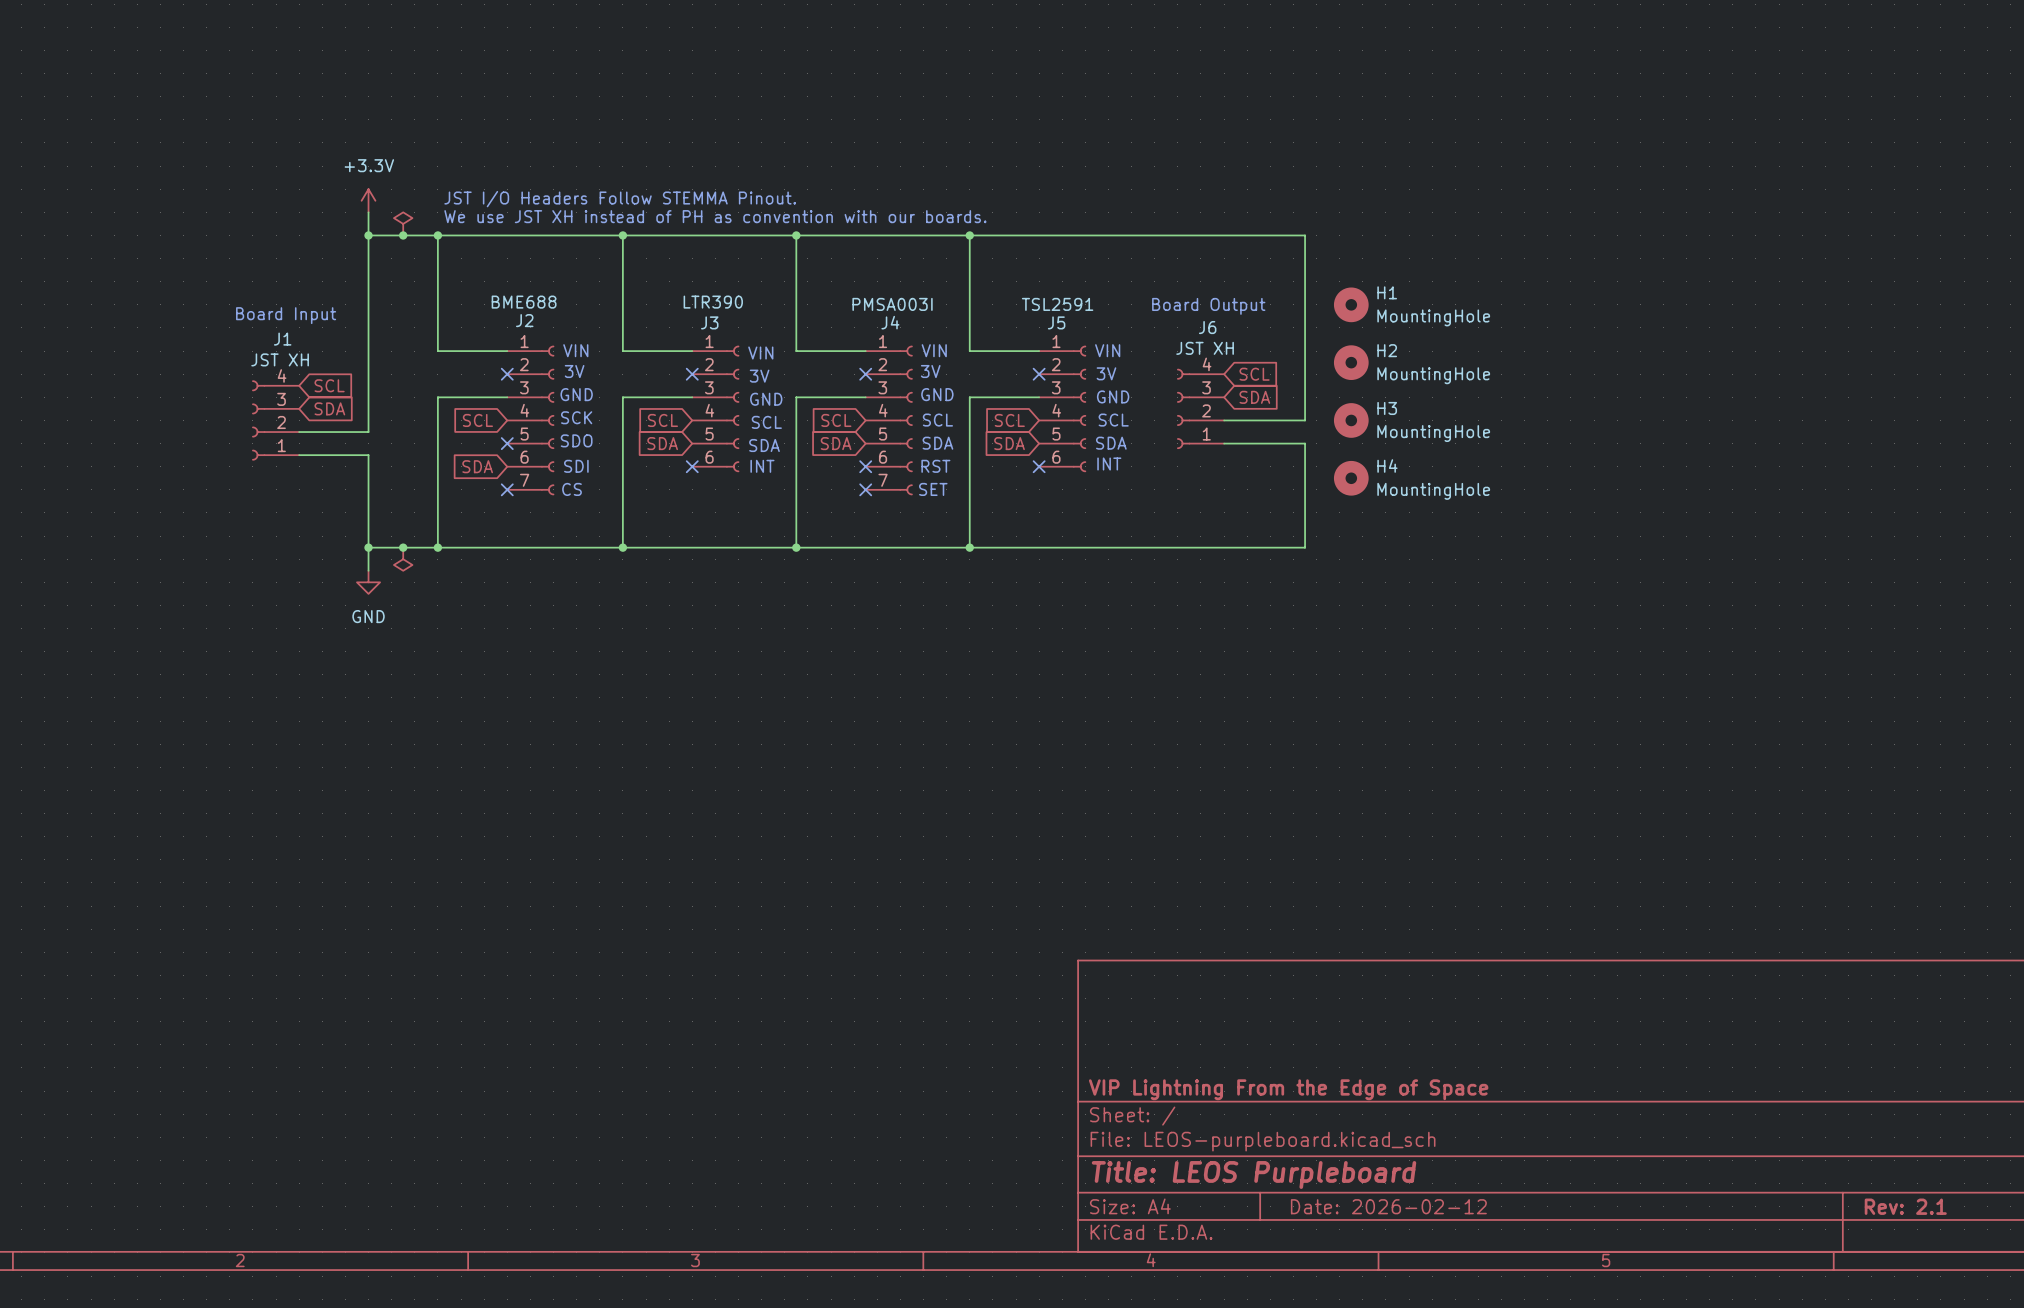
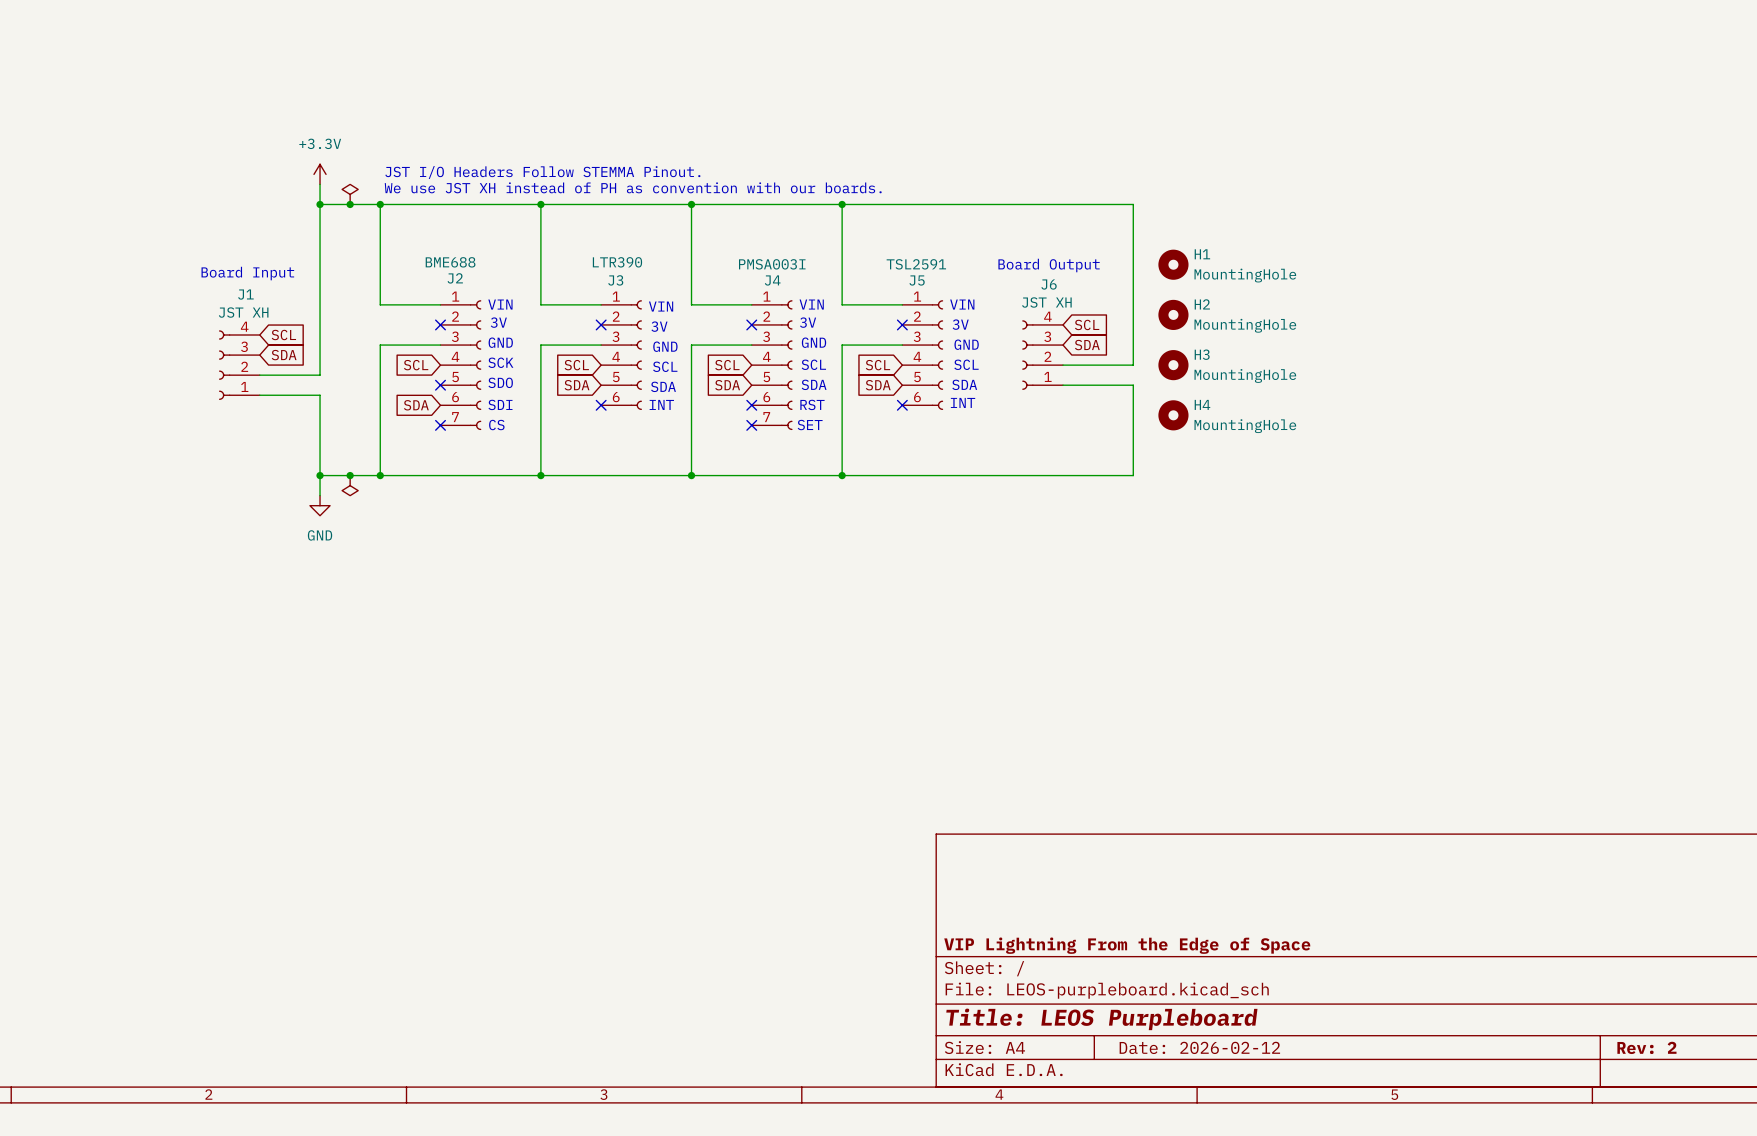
title block: Rev: 2.1 (1905, 1206) -> Rev: 2 (1646, 1047)

